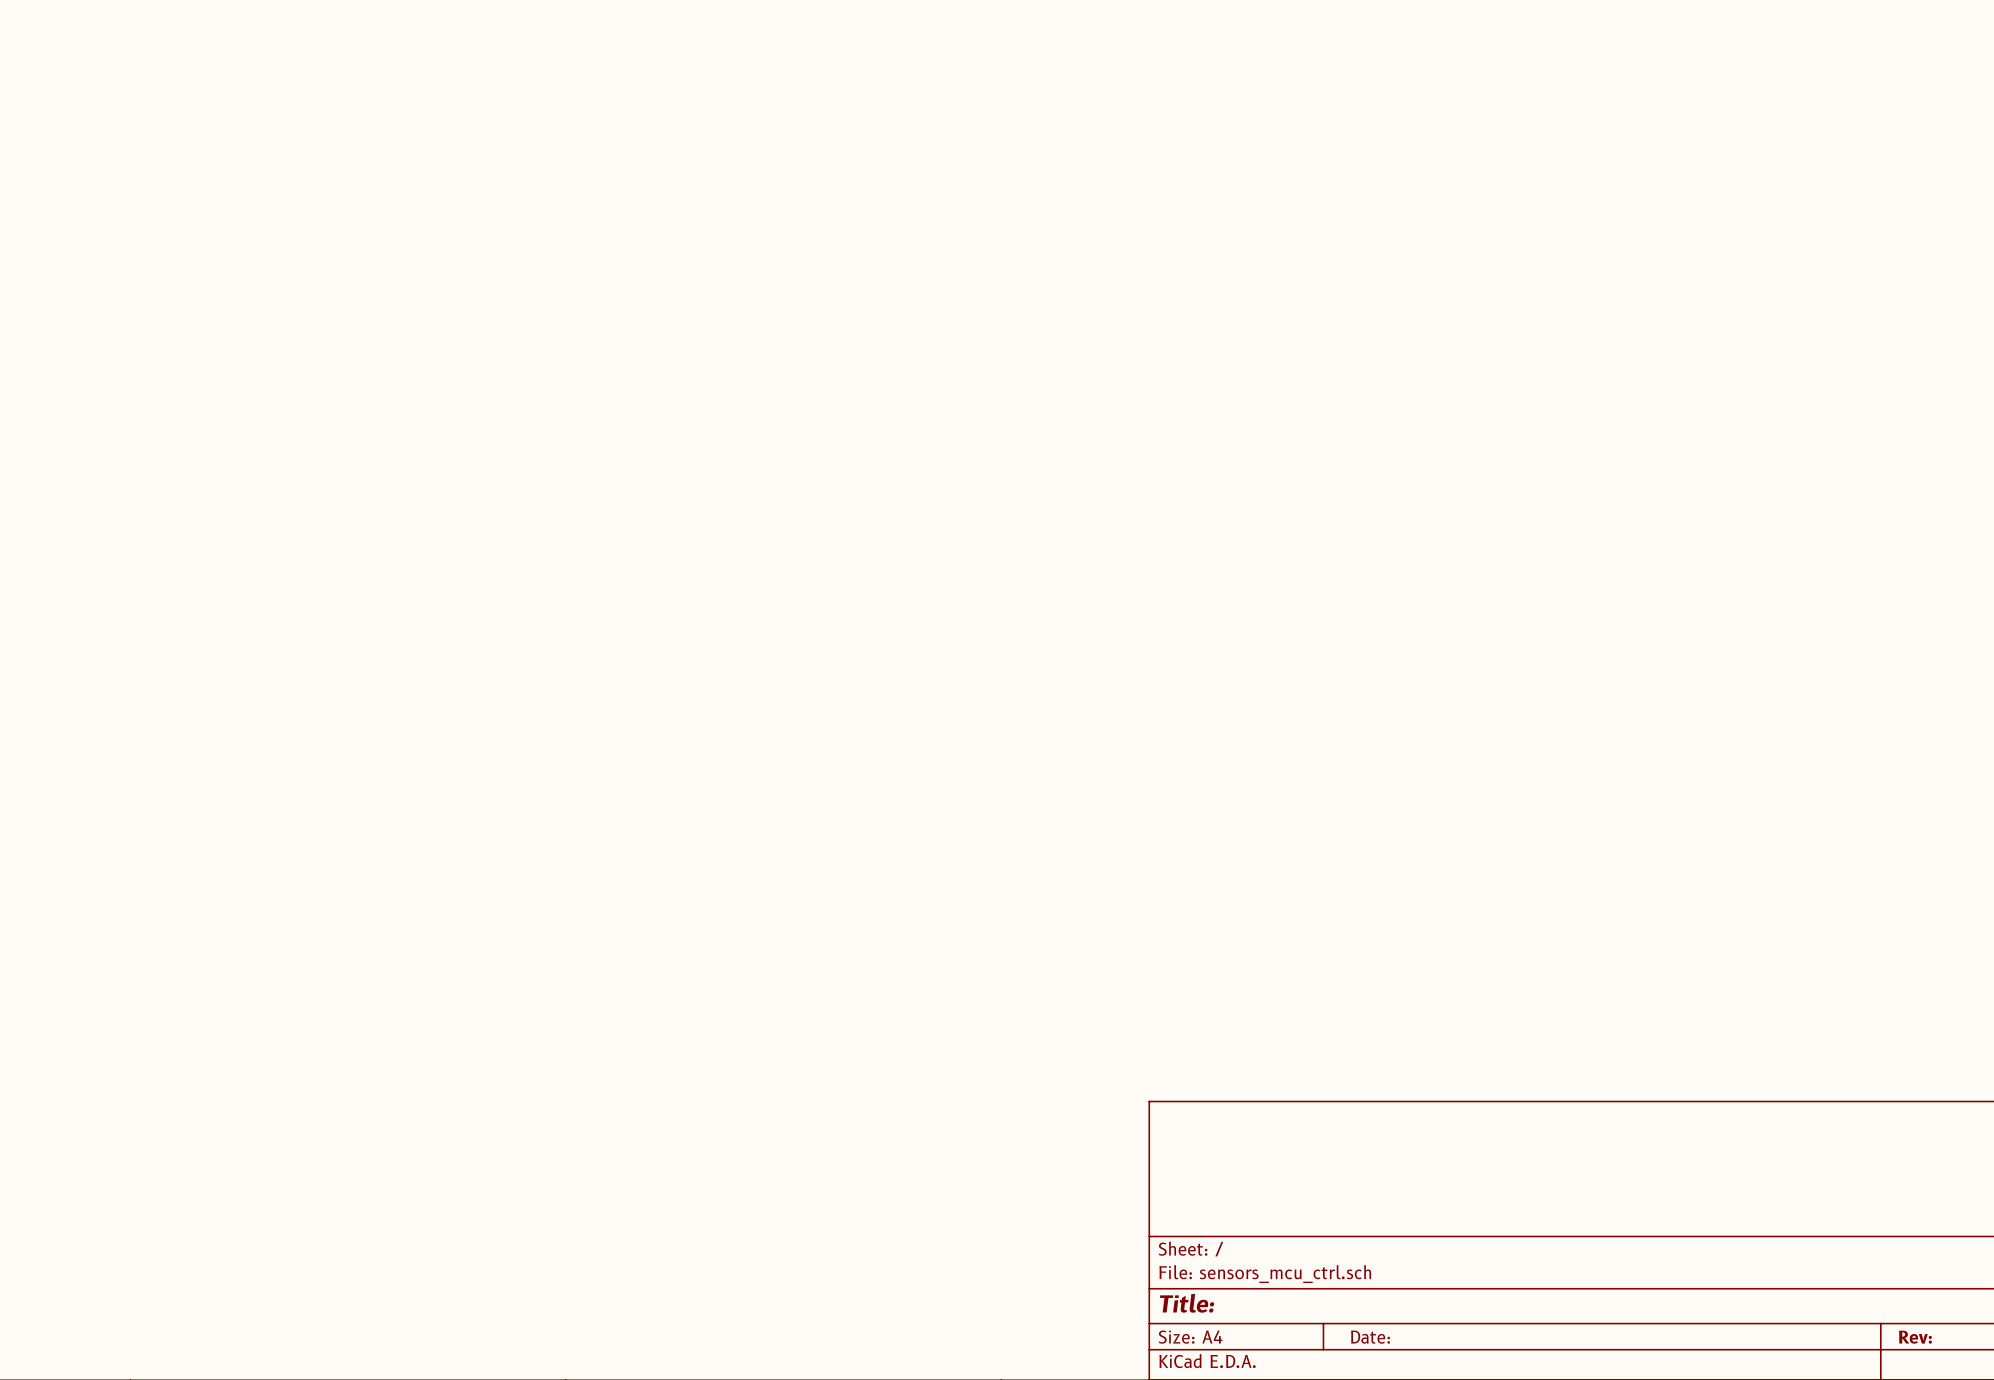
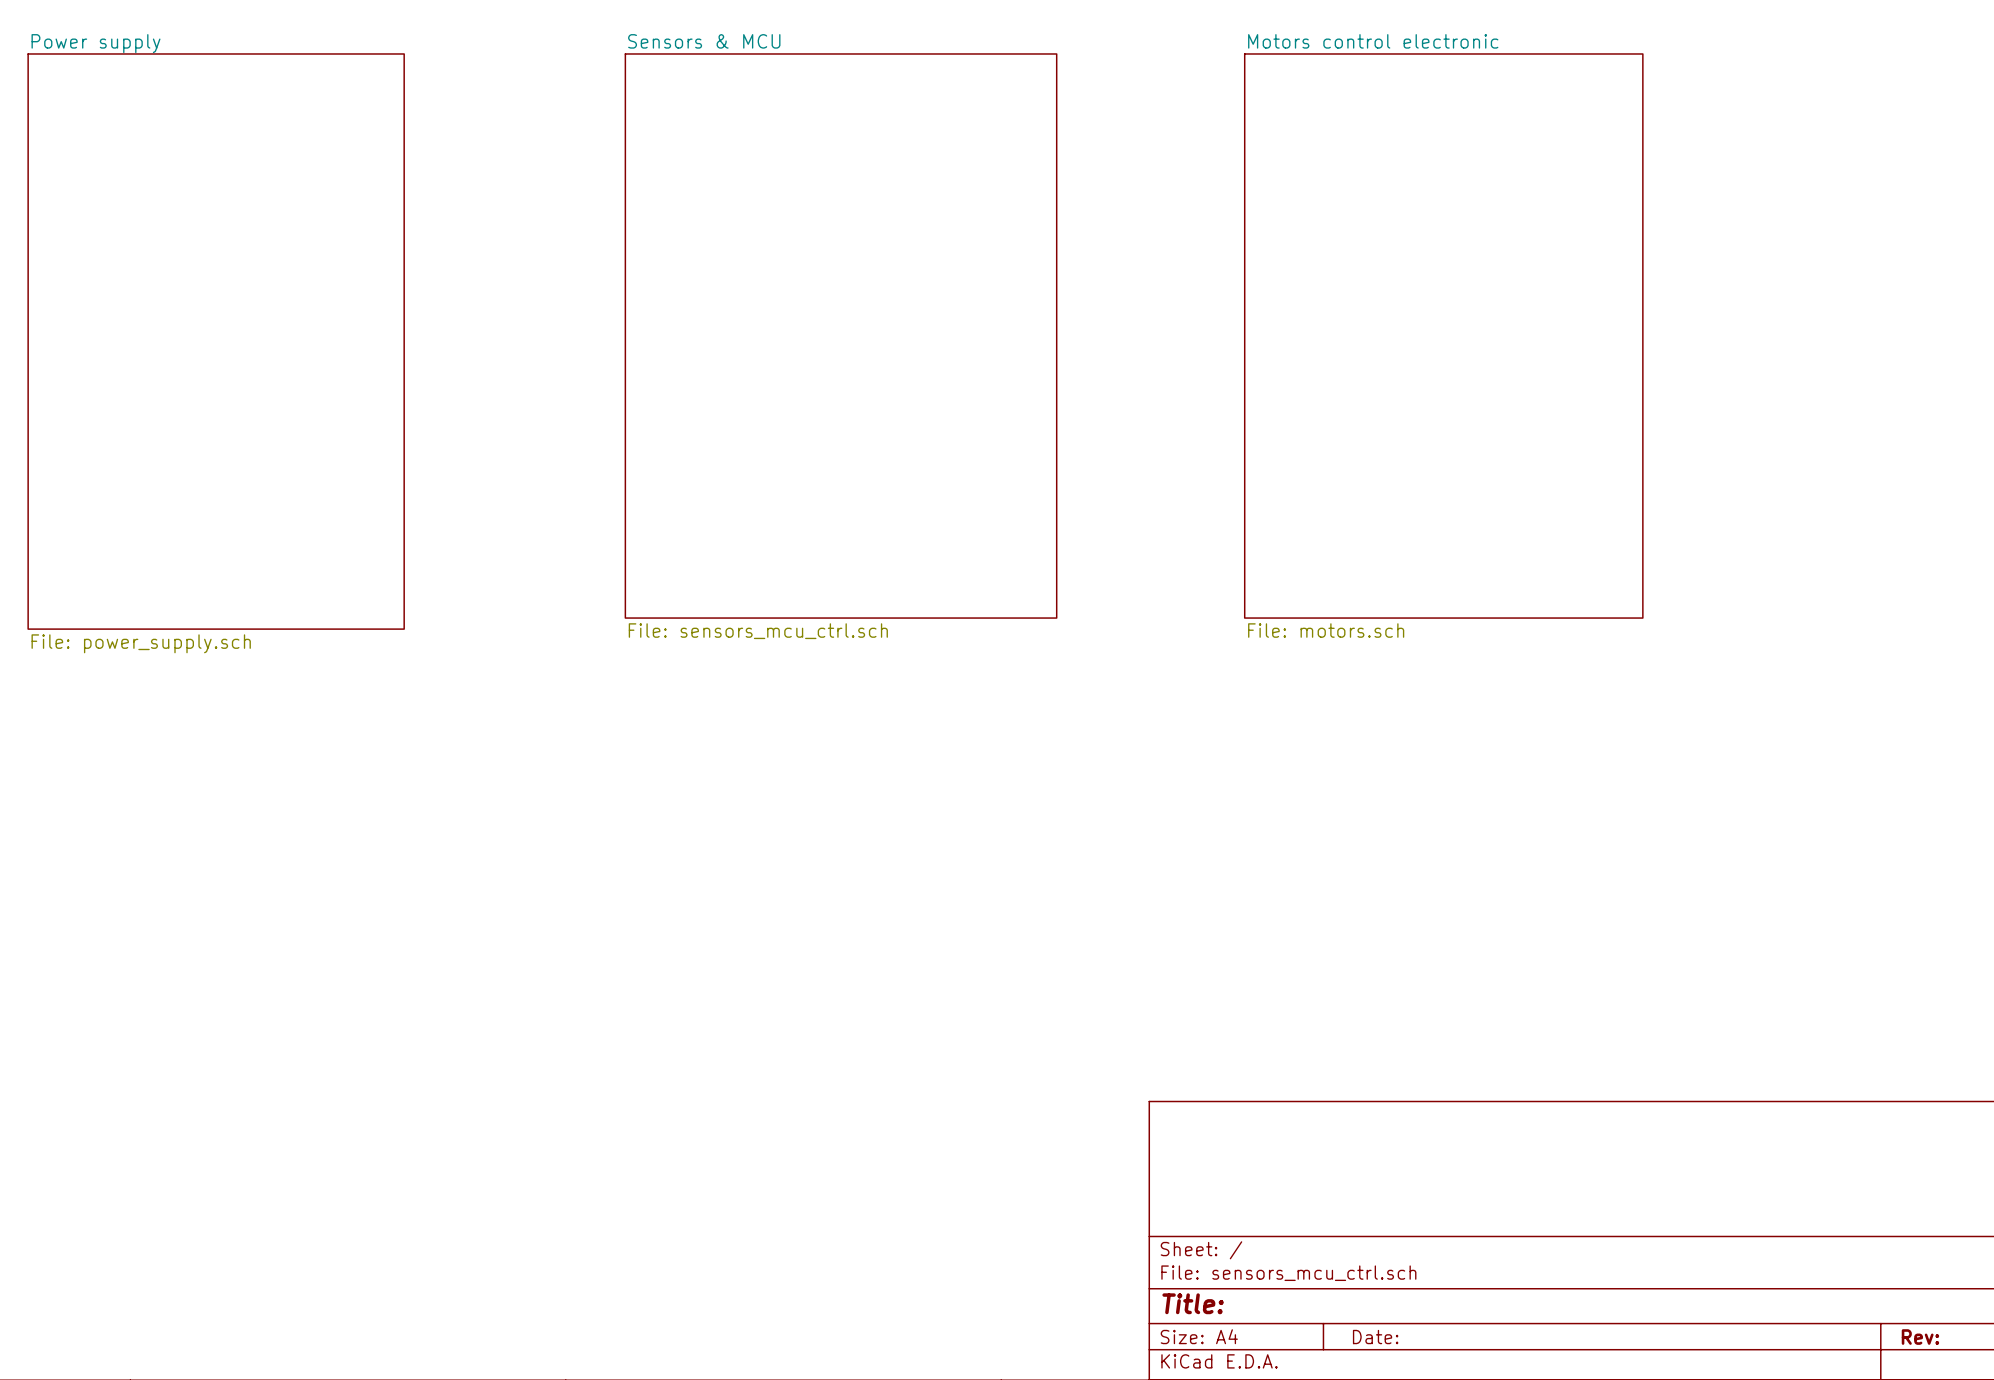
sheet Sensors & MCU: none -> File: sensors_mcu_ctrl.sch (841, 336)
sheet Motors control electronic: none -> File: motors.sch (1443, 336)
sheet Power supply: none -> File: power_supply.sch (216, 341)

